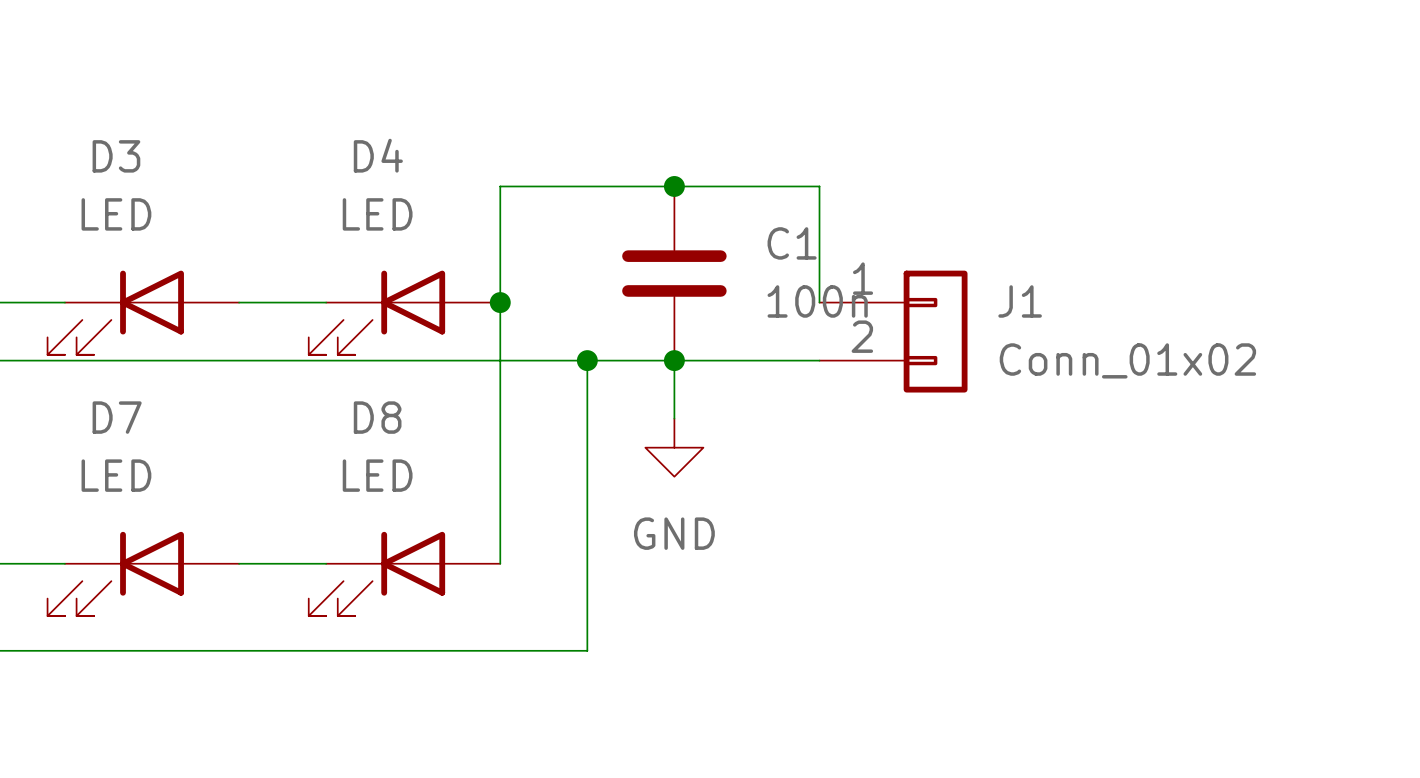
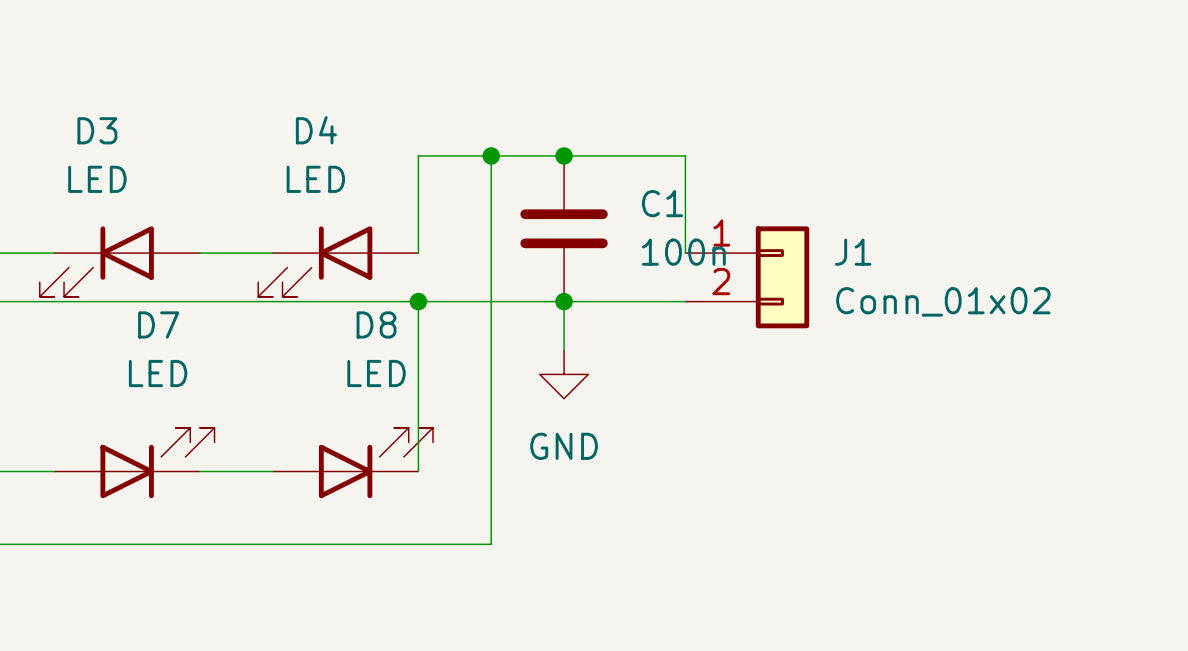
wire: none -> (491, 155) (491, 301)
junction: none -> (491, 155)
wire: (500, 302) (500, 360) -> none
junction: (500, 302) -> none
junction: none -> (418, 301)
junction: (587, 360) -> none
D7 name position: D7 (117, 417) -> D7 (158, 324)
D8 name position: D8 (377, 417) -> D8 (376, 324)
D7 value position: LED (116, 475) -> LED (158, 373)
D8 value position: LED (377, 475) -> LED (376, 373)
D7 rotation: 0° (115, 573) -> 180° (157, 463)
D8 rotation: 0° (376, 573) -> 180° (375, 463)

